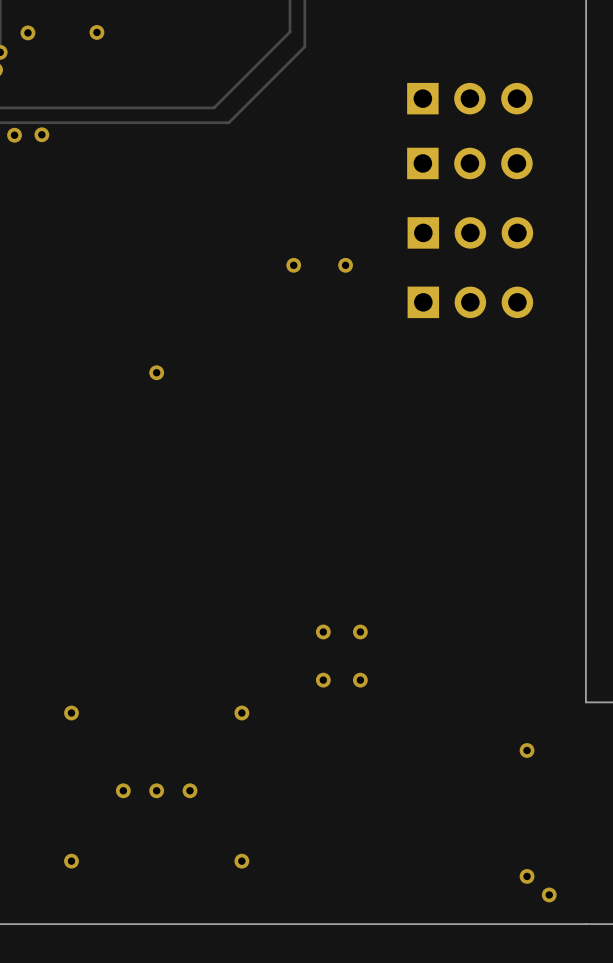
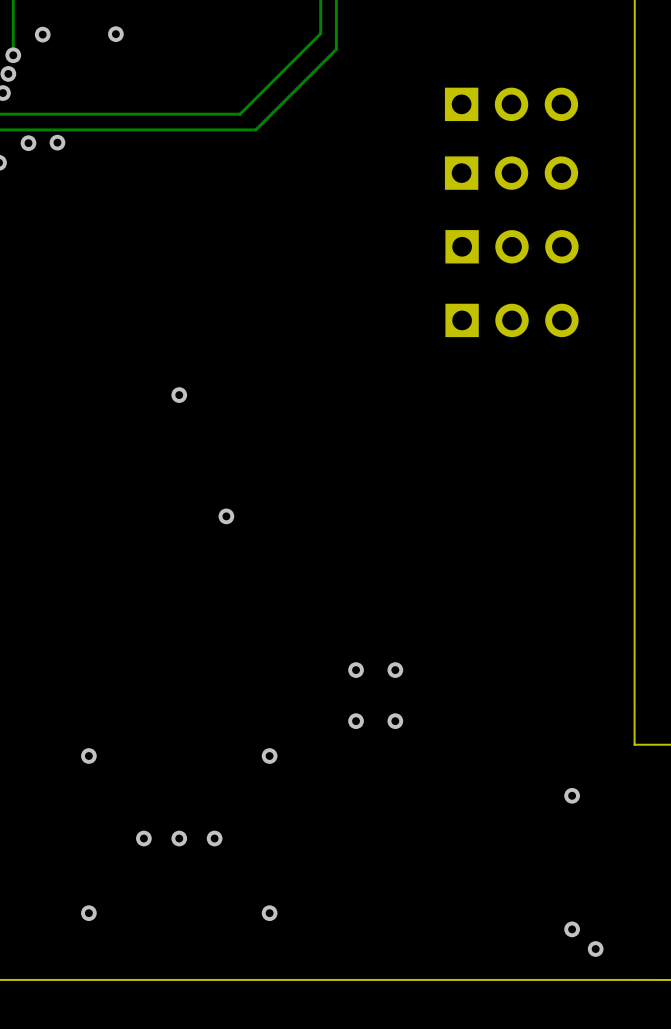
via: (293, 265) -> none
via: (345, 265) -> none
via: none -> (226, 516)

